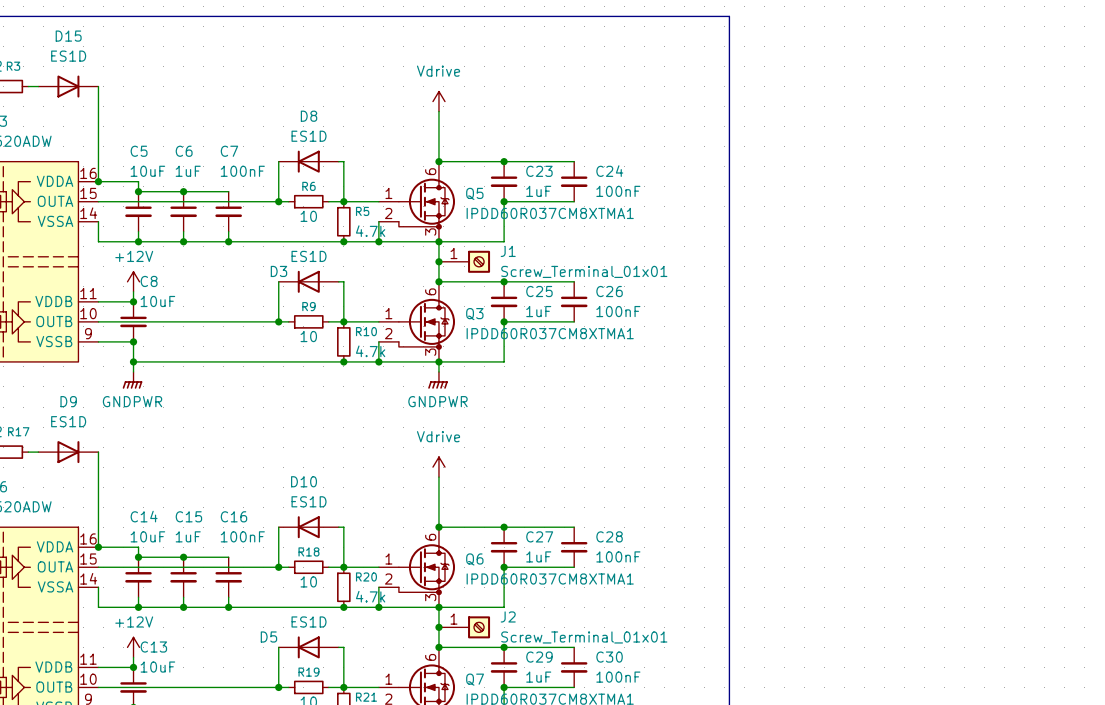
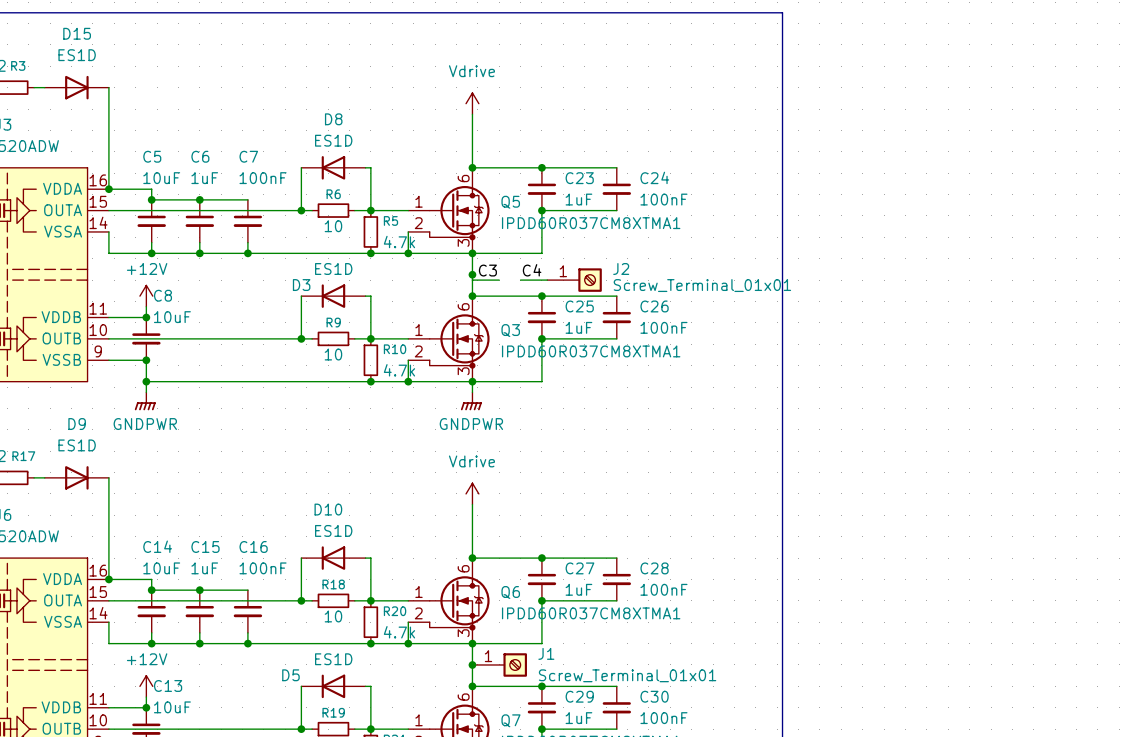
label: none -> C3 (487, 270)
label: none -> C4 (532, 270)
J1: Screw_Terminal_01x01 (464, 261) -> none
wire: none -> (472, 280) (499, 280)
wire: none -> (520, 280) (547, 280)
J2: none -> Screw_Terminal_01x01 (574, 280)
J2 name: J2 (508, 616) -> J1 (546, 653)

